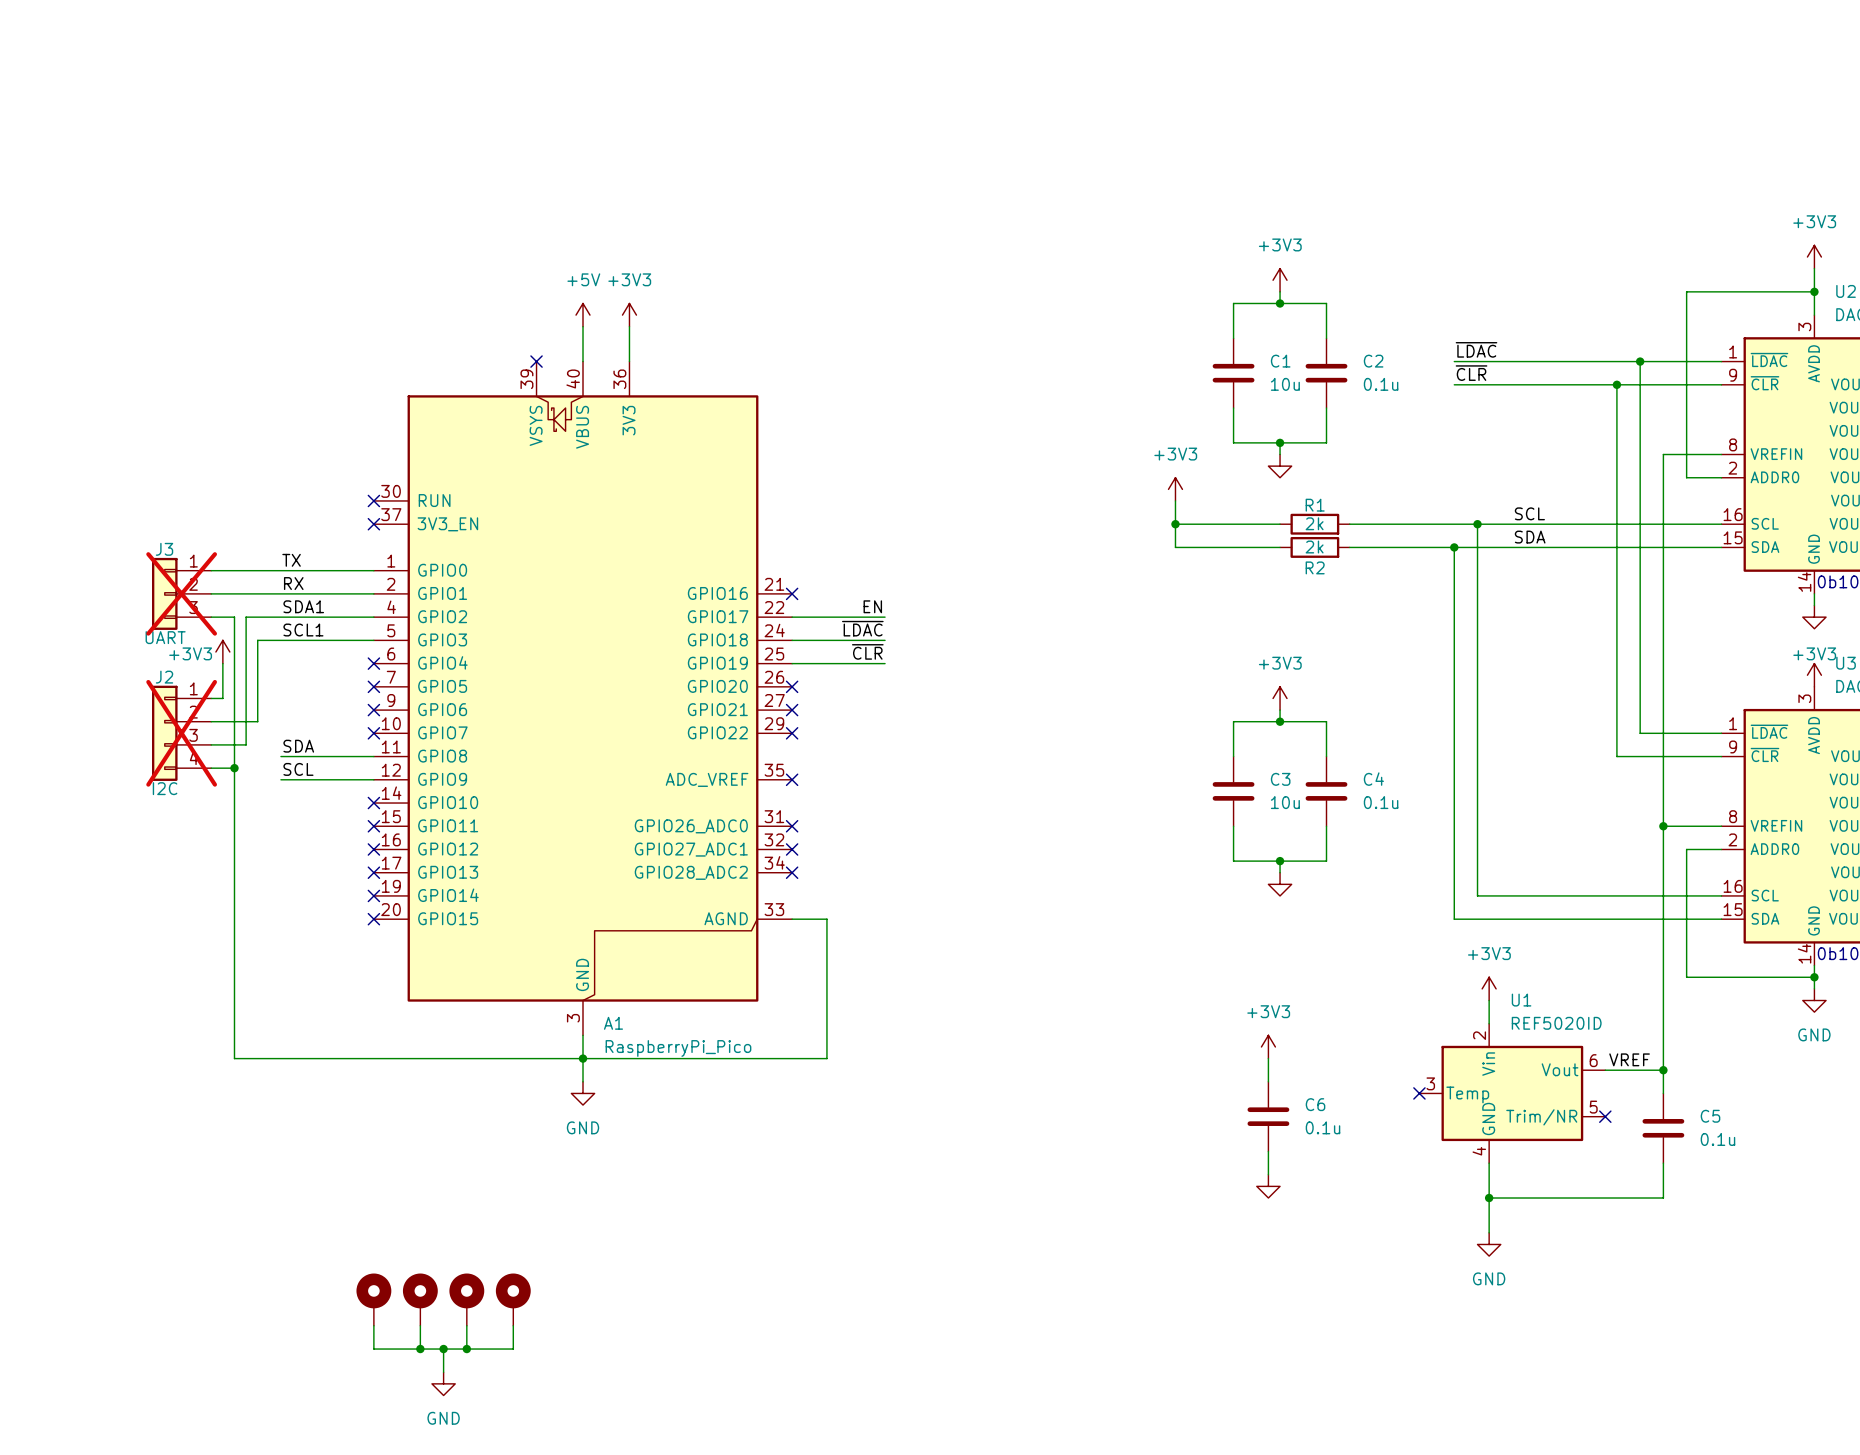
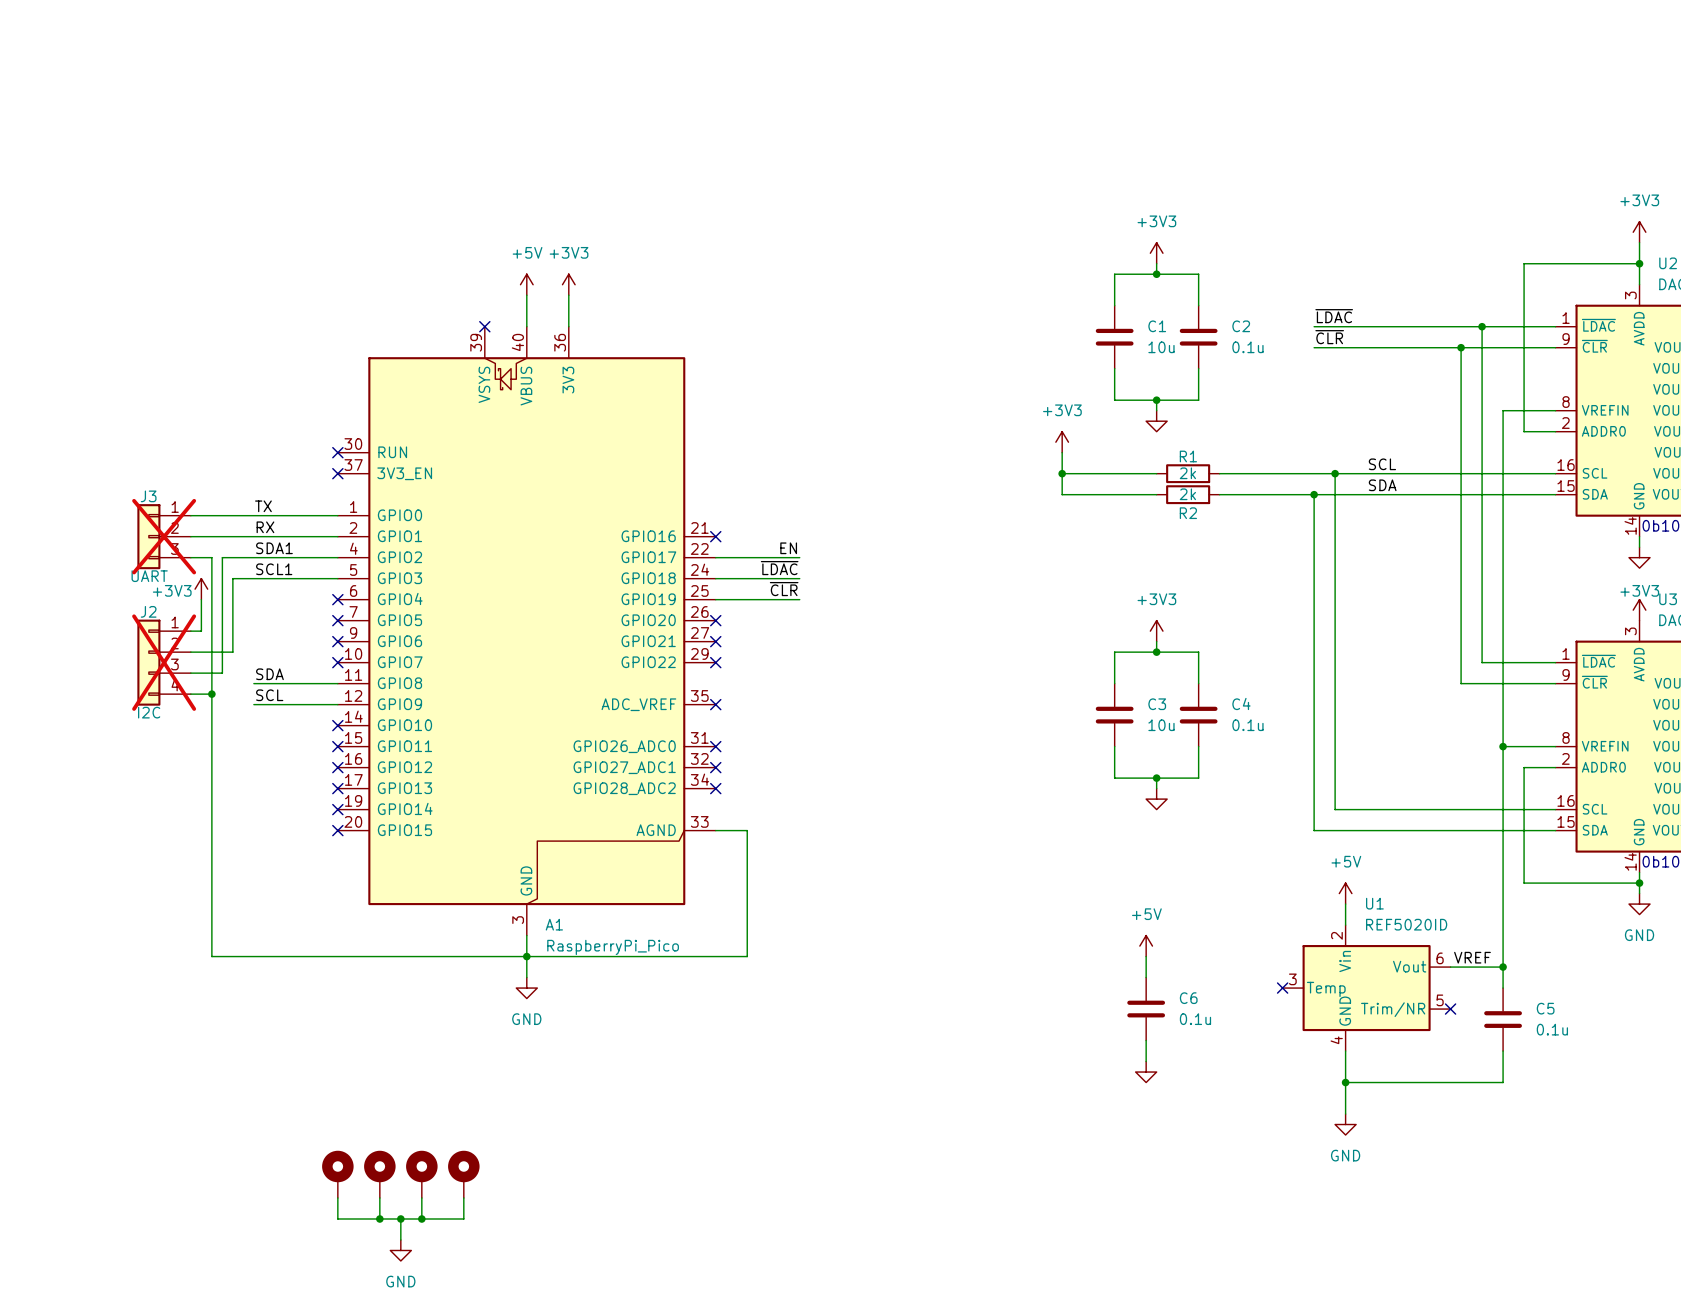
power symbol: +3V3 (1489, 988) -> +5V (1345, 893)
power symbol: +3V3 (1268, 1046) -> +5V (1146, 946)

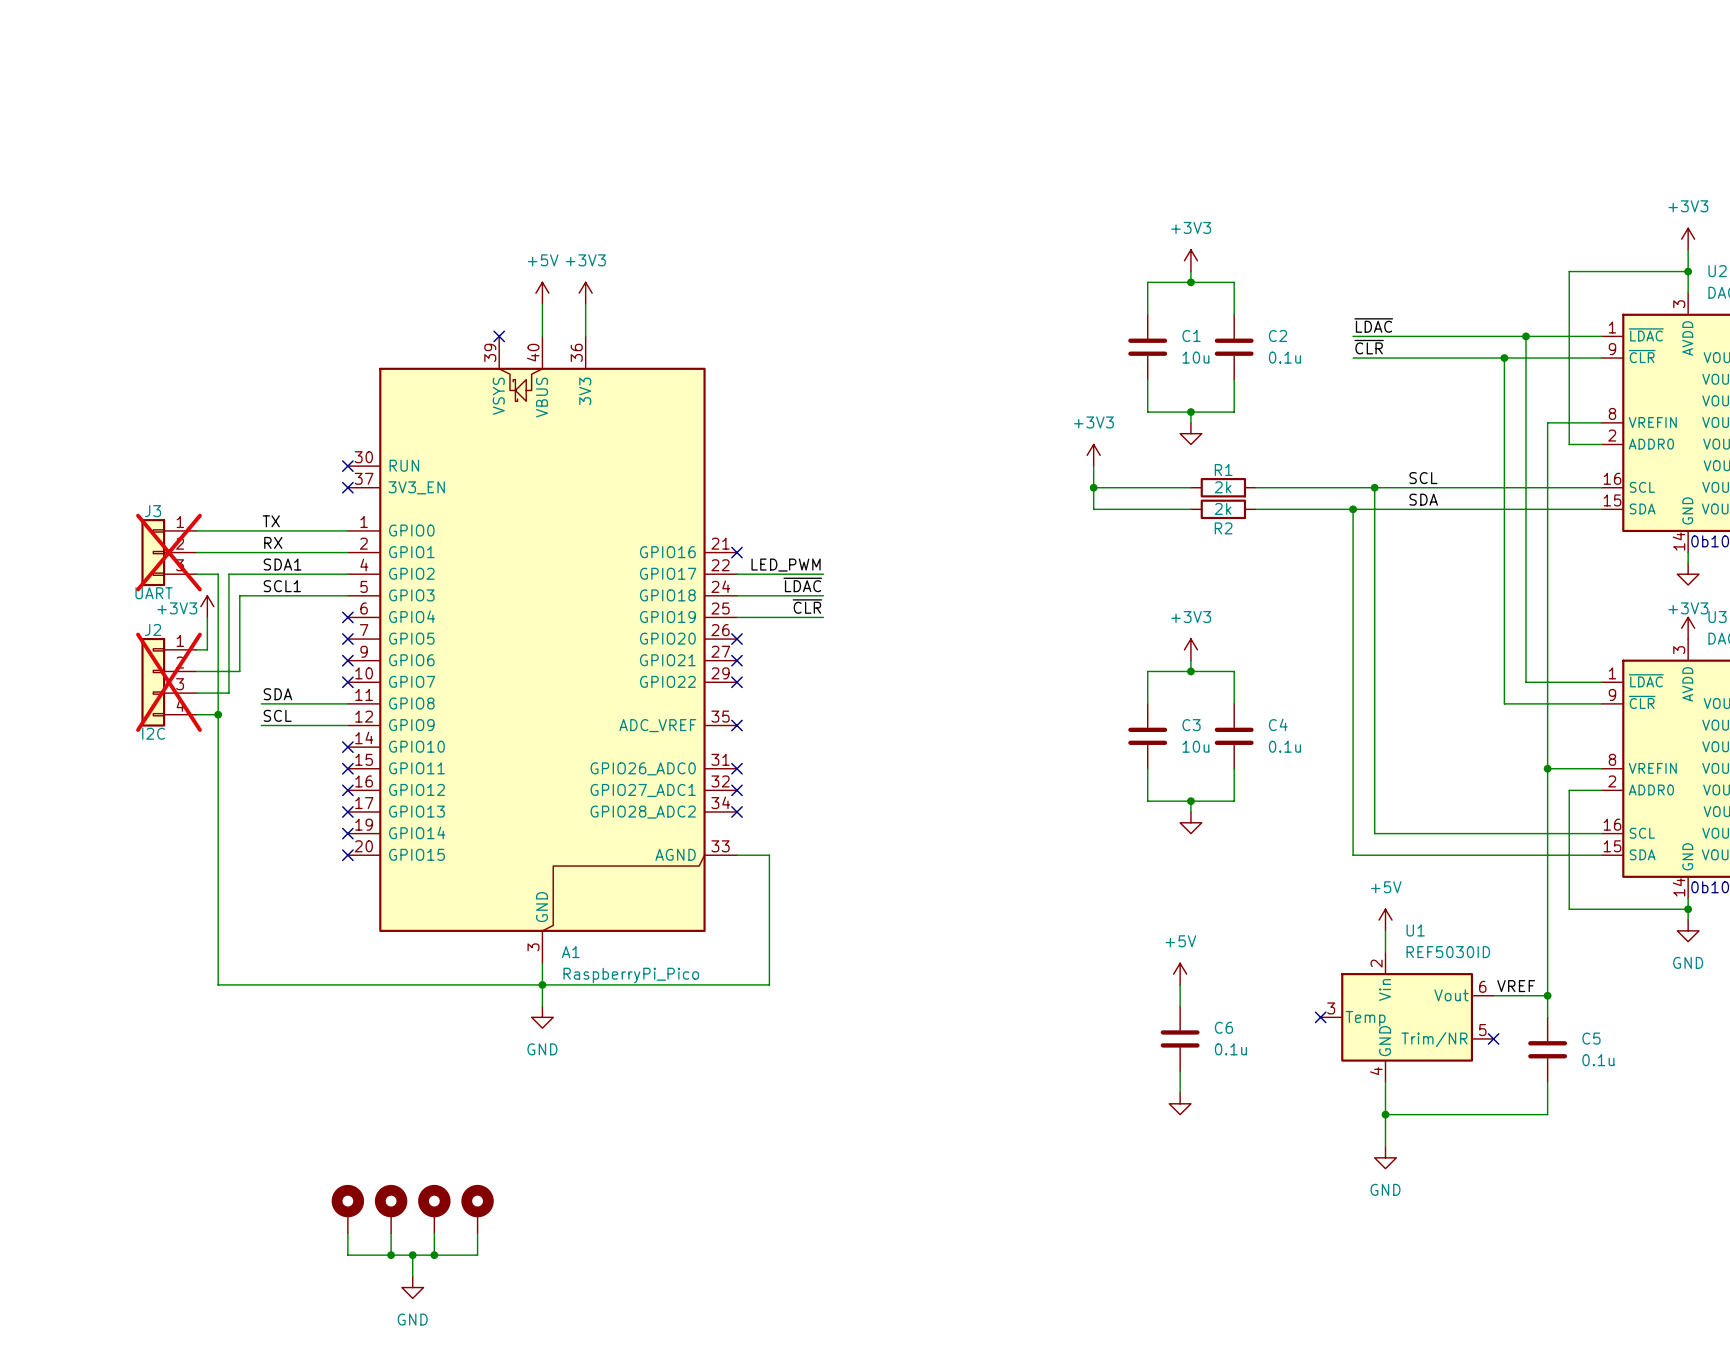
label: EN (788, 548) -> LED_PWM (786, 565)
U1 value: REF5020ID (1406, 924) -> REF5030ID (1448, 952)

